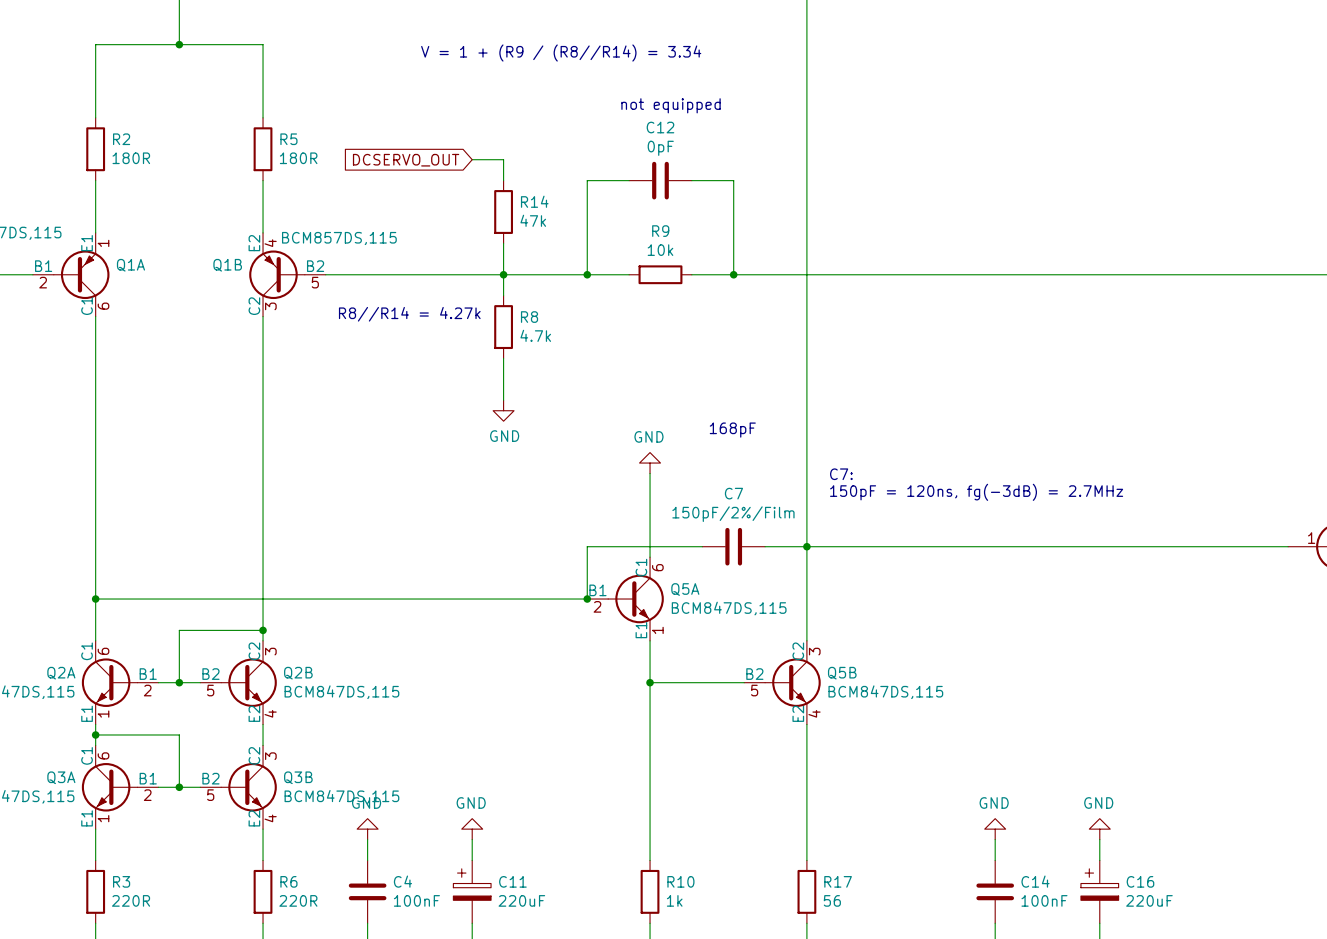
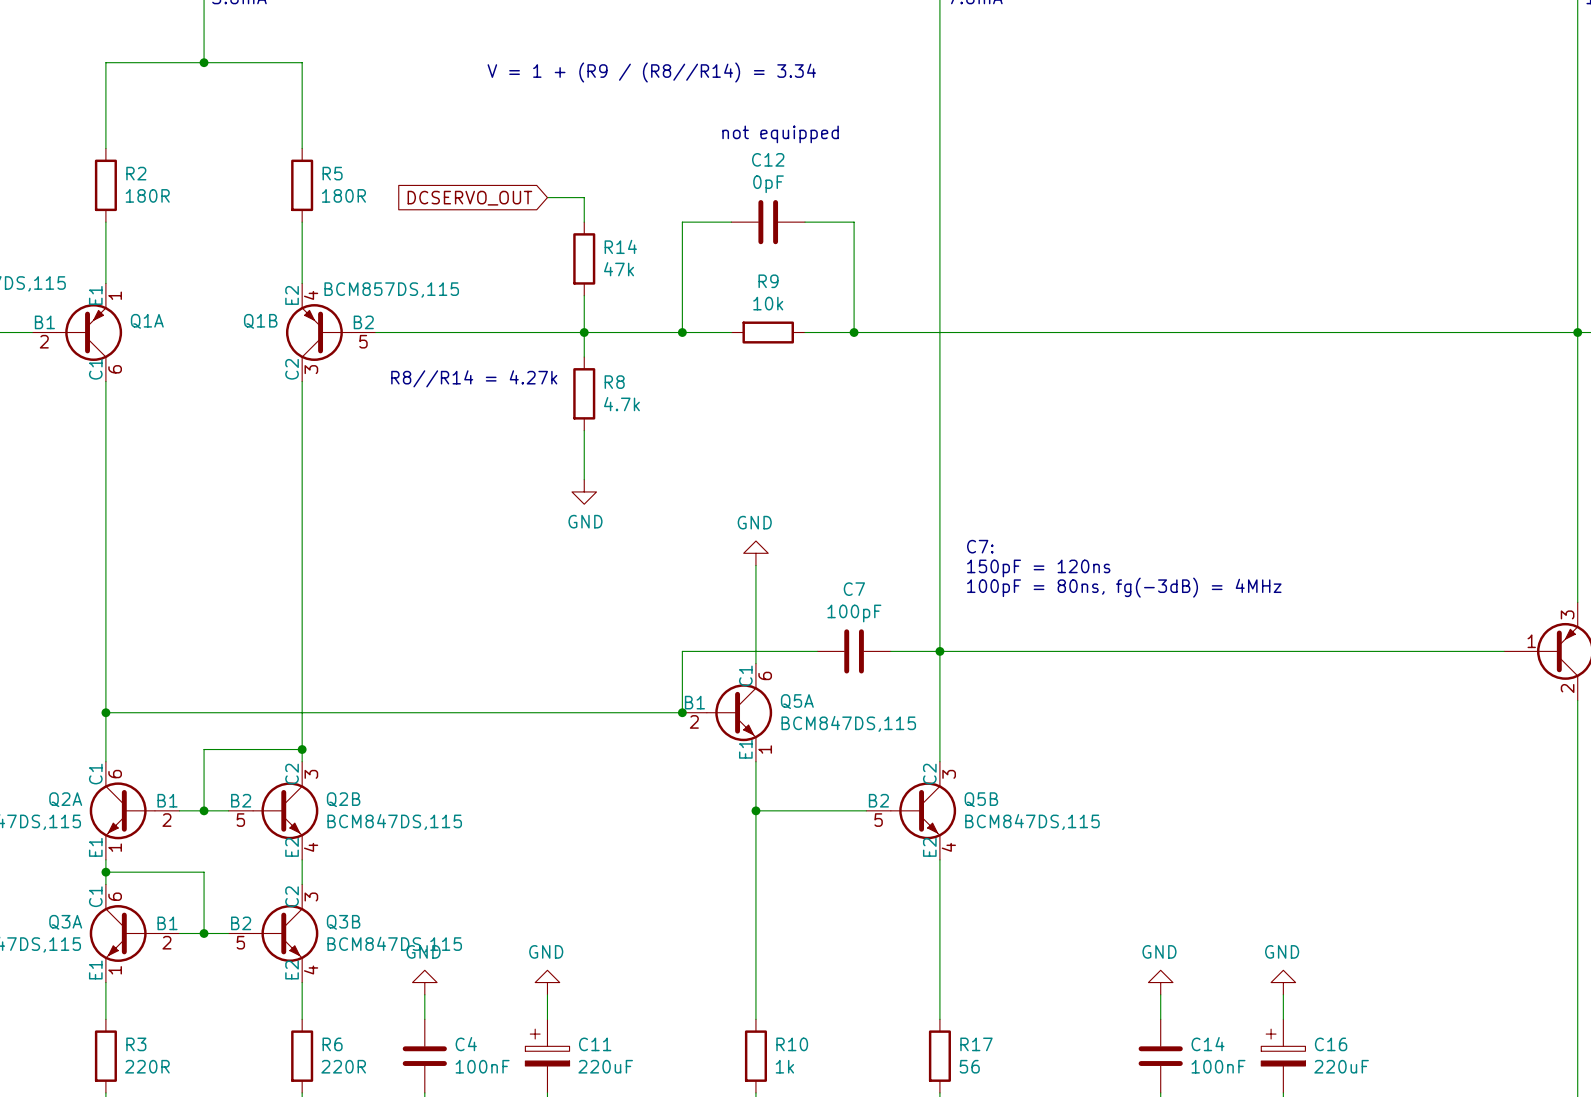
text: 168pF (732, 430) -> none
text: none -> C7: (980, 546)
text: C7: (841, 474) -> 150pF = 120ns (1038, 568)
text: 150pF = 120ns, fg(-3dB) = 2.7MHz (976, 492) -> 100pF = 80ns, fg(-3dB) = 4MHz (1124, 587)
C7 value: 150pF/2%/Film (733, 514) -> 100pF (854, 613)

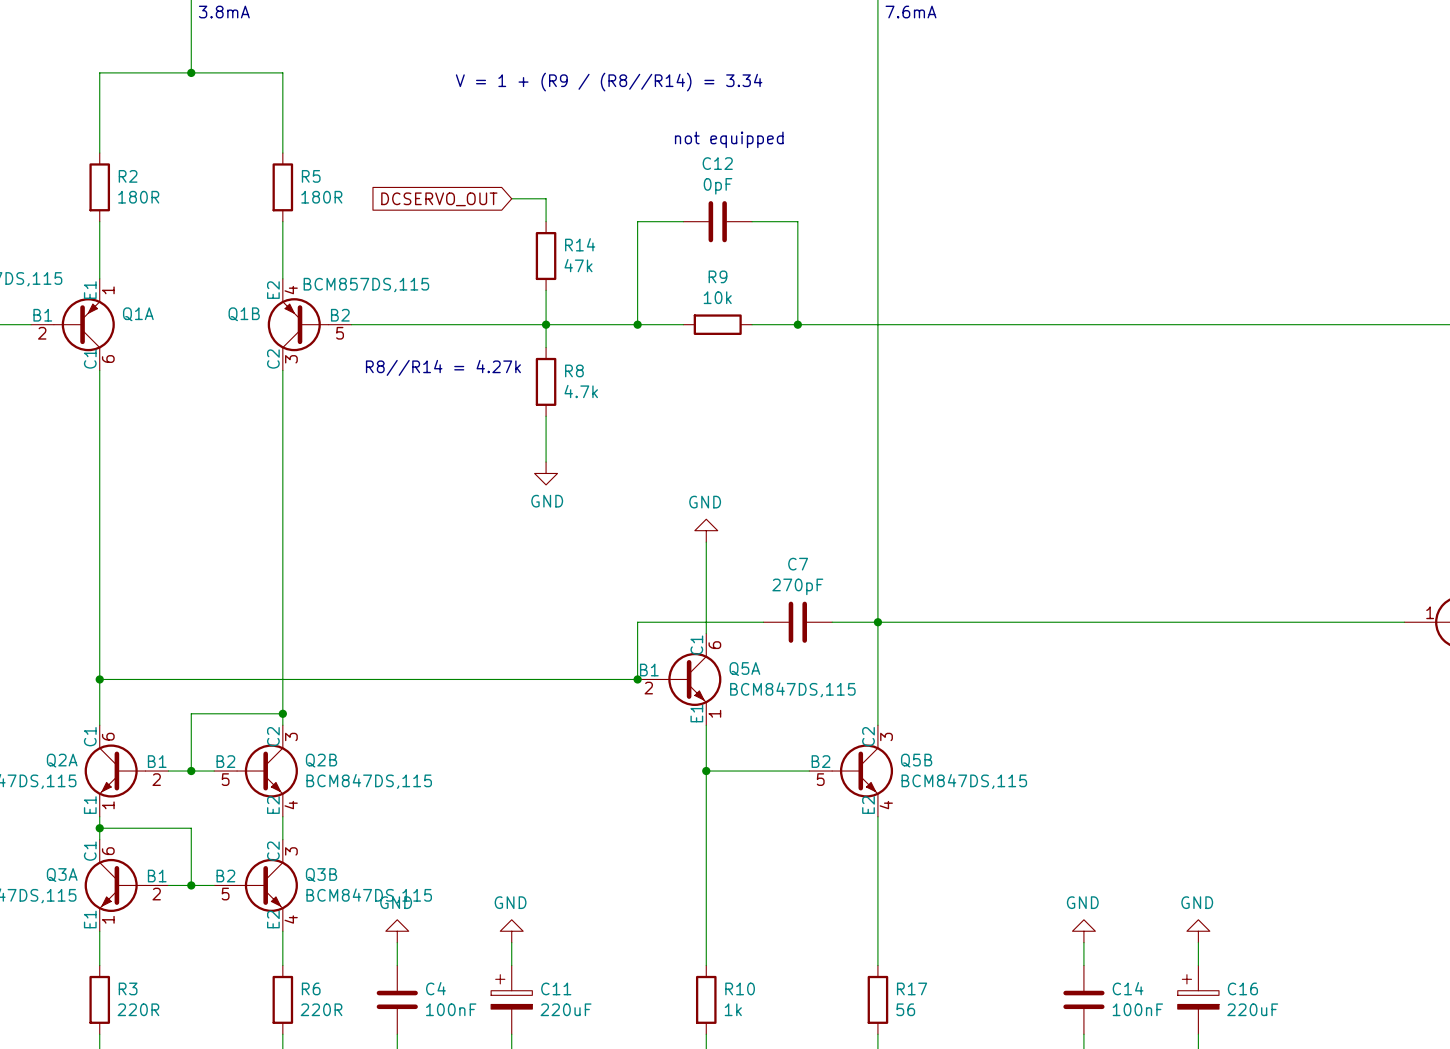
text: C7: (980, 546) -> none
text: 150pF = 120ns (1038, 568) -> none
text: 100pF = 80ns, fg(-3dB) = 4MHz (1124, 587) -> none
C7 value: 100pF (854, 613) -> 270pF (797, 586)

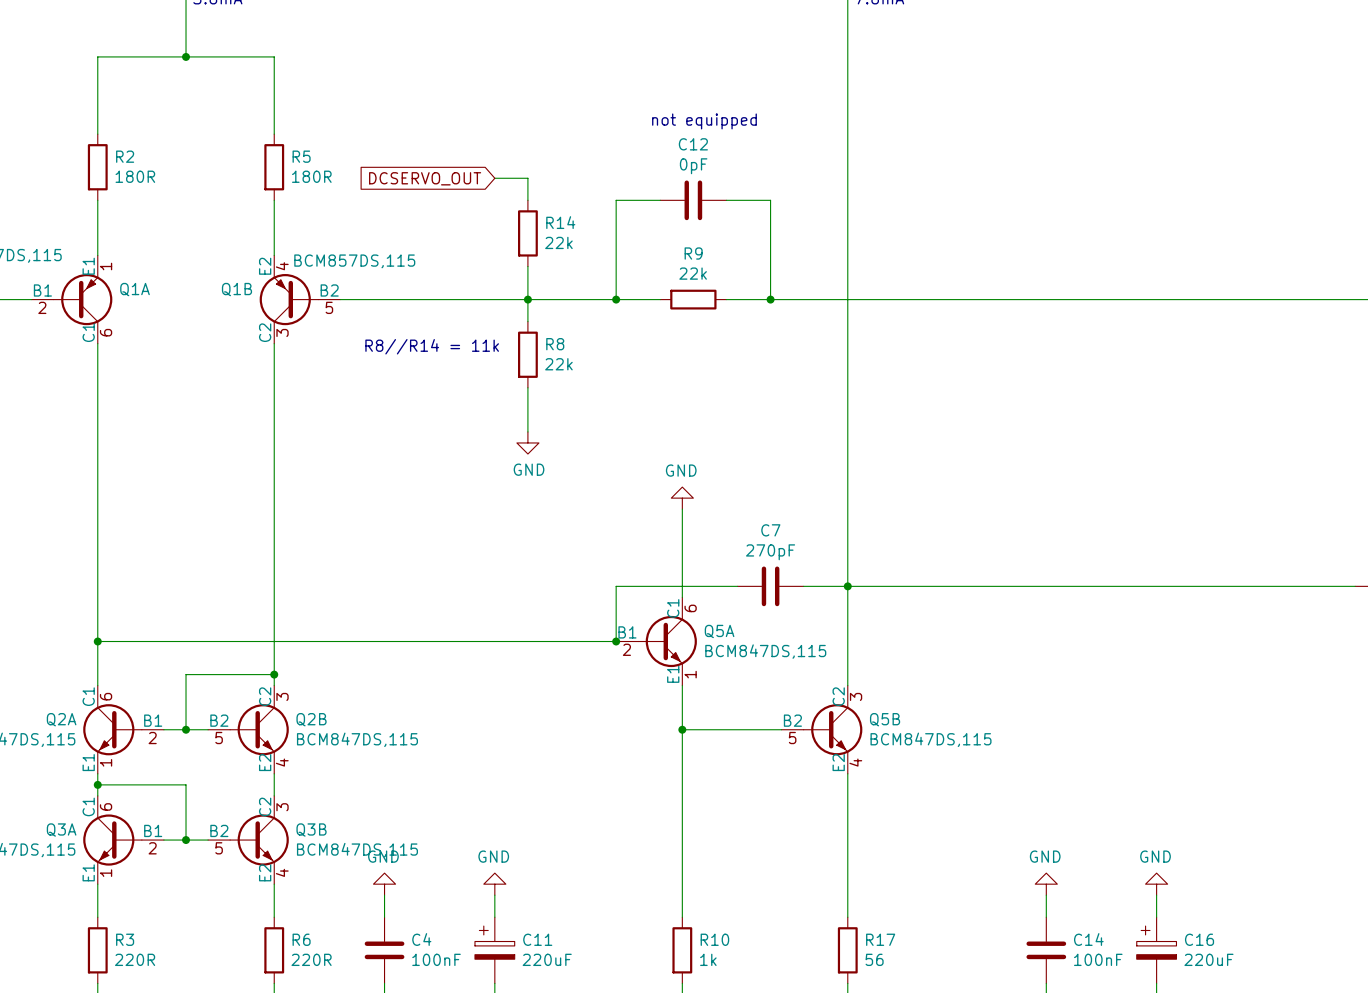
text: V = 1 + (R9 / (R8//R14) = 3.34 (609, 82) -> none
R14 value: 47k (578, 265) -> 22k (558, 242)
R9 value: 10k (717, 297) -> 22k (693, 273)
text: R8//R14 = 4.27k (443, 367) -> R8//R14 = 11k (432, 346)
R8 value: 4.7k (581, 391) -> 22k (558, 364)

